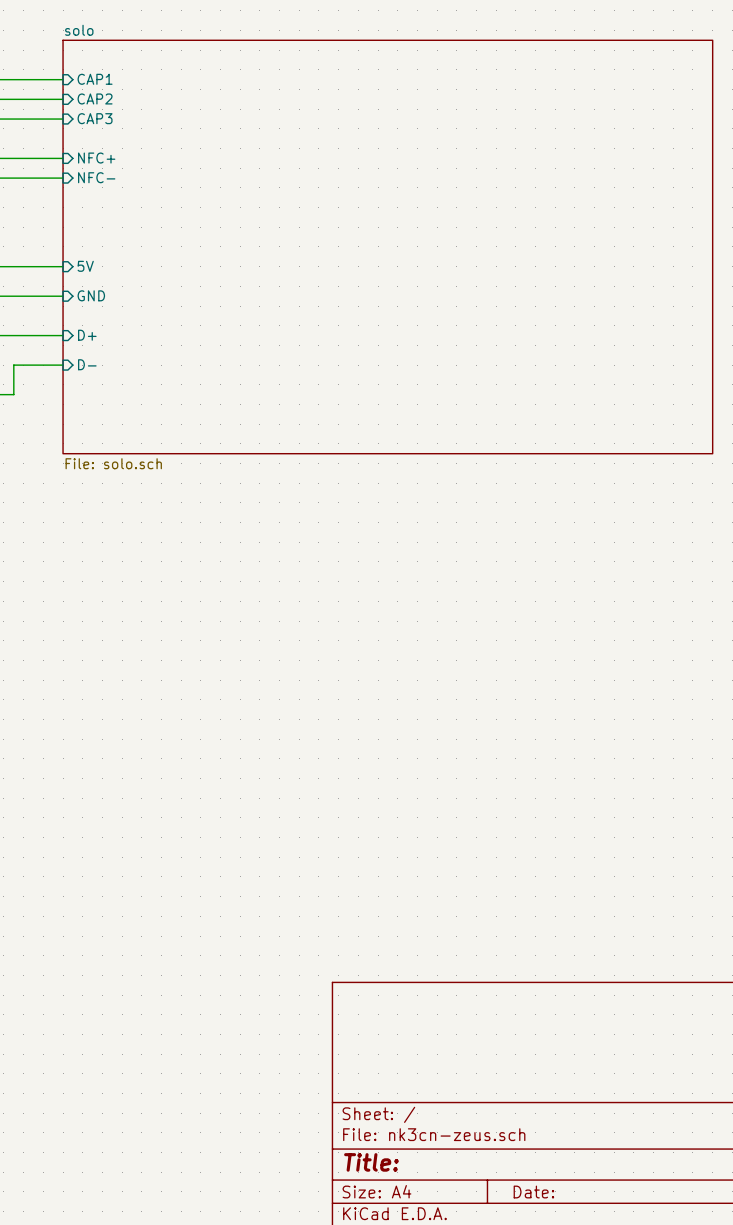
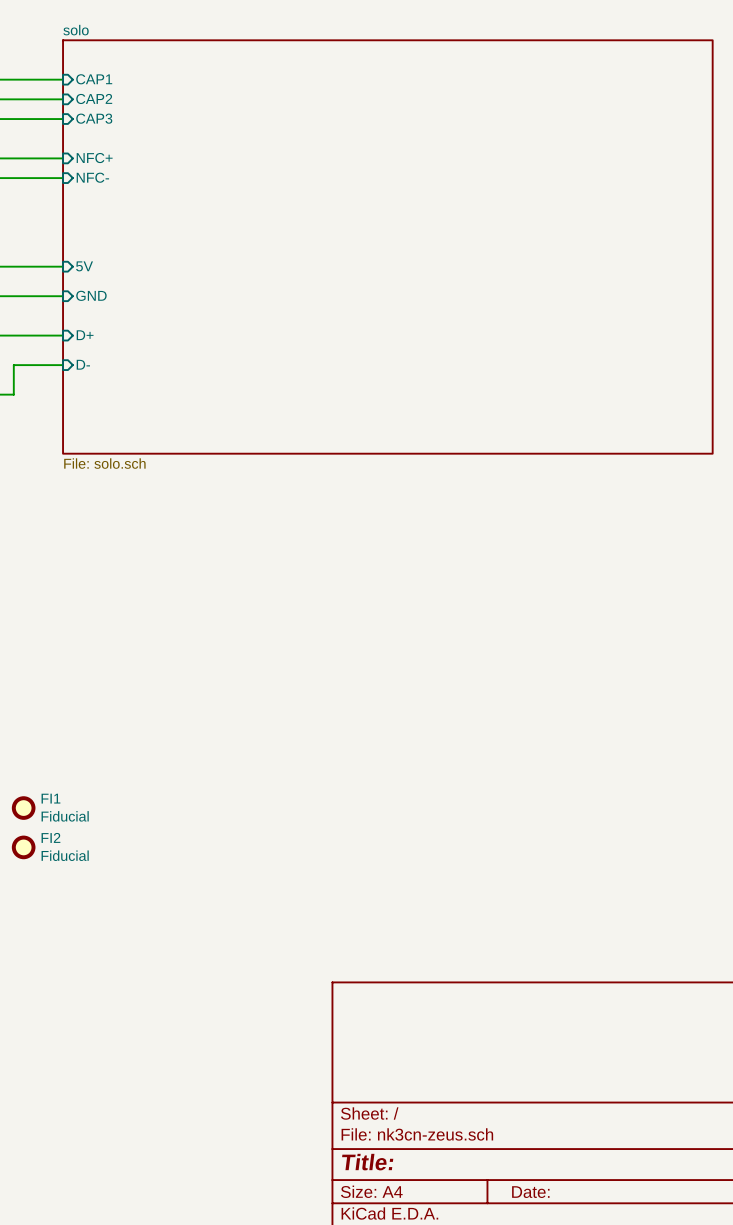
FI1: none -> Fiducial (23, 808)
FI2: none -> Fiducial (23, 847)

